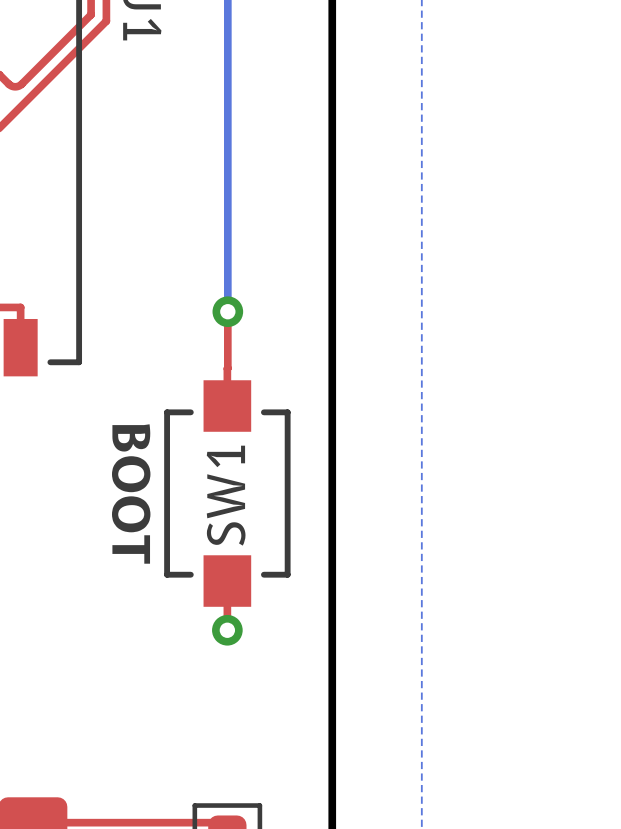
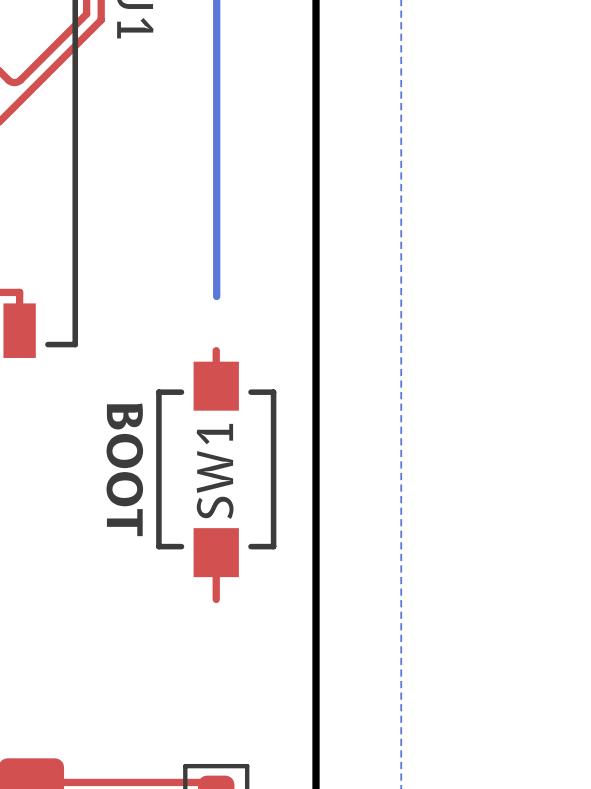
top track: (227, 311) (227, 368) -> none
via: (227, 311) -> none
via: (227, 630) -> none

